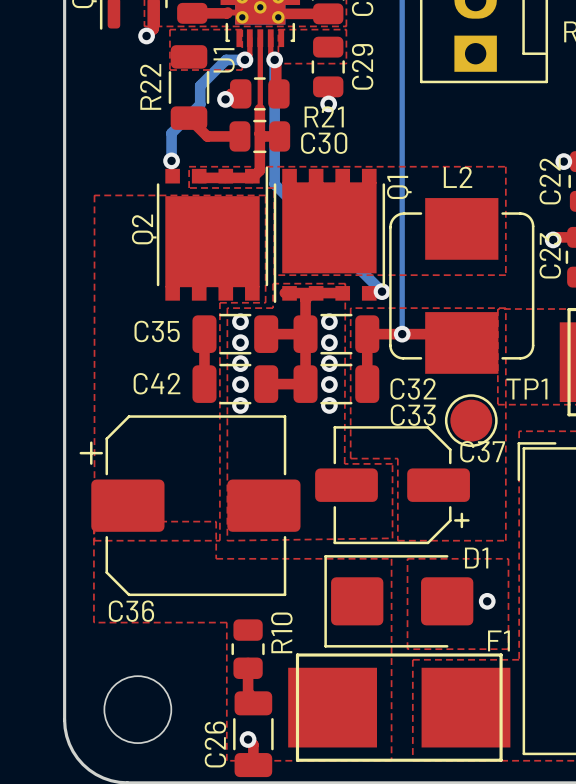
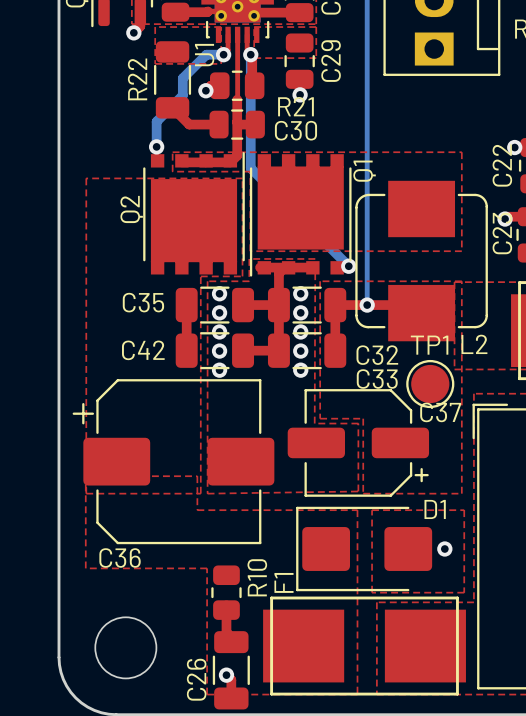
L2 name position: L2 (458, 177) -> L2 (474, 344)
TP1 name position: TP1 (526, 389) -> TP1 (429, 345)
F1 name rotation: 0° (498, 640) -> 90° counterclockwise (283, 582)
F1 name position: F1 (498, 640) -> F1 (283, 582)

